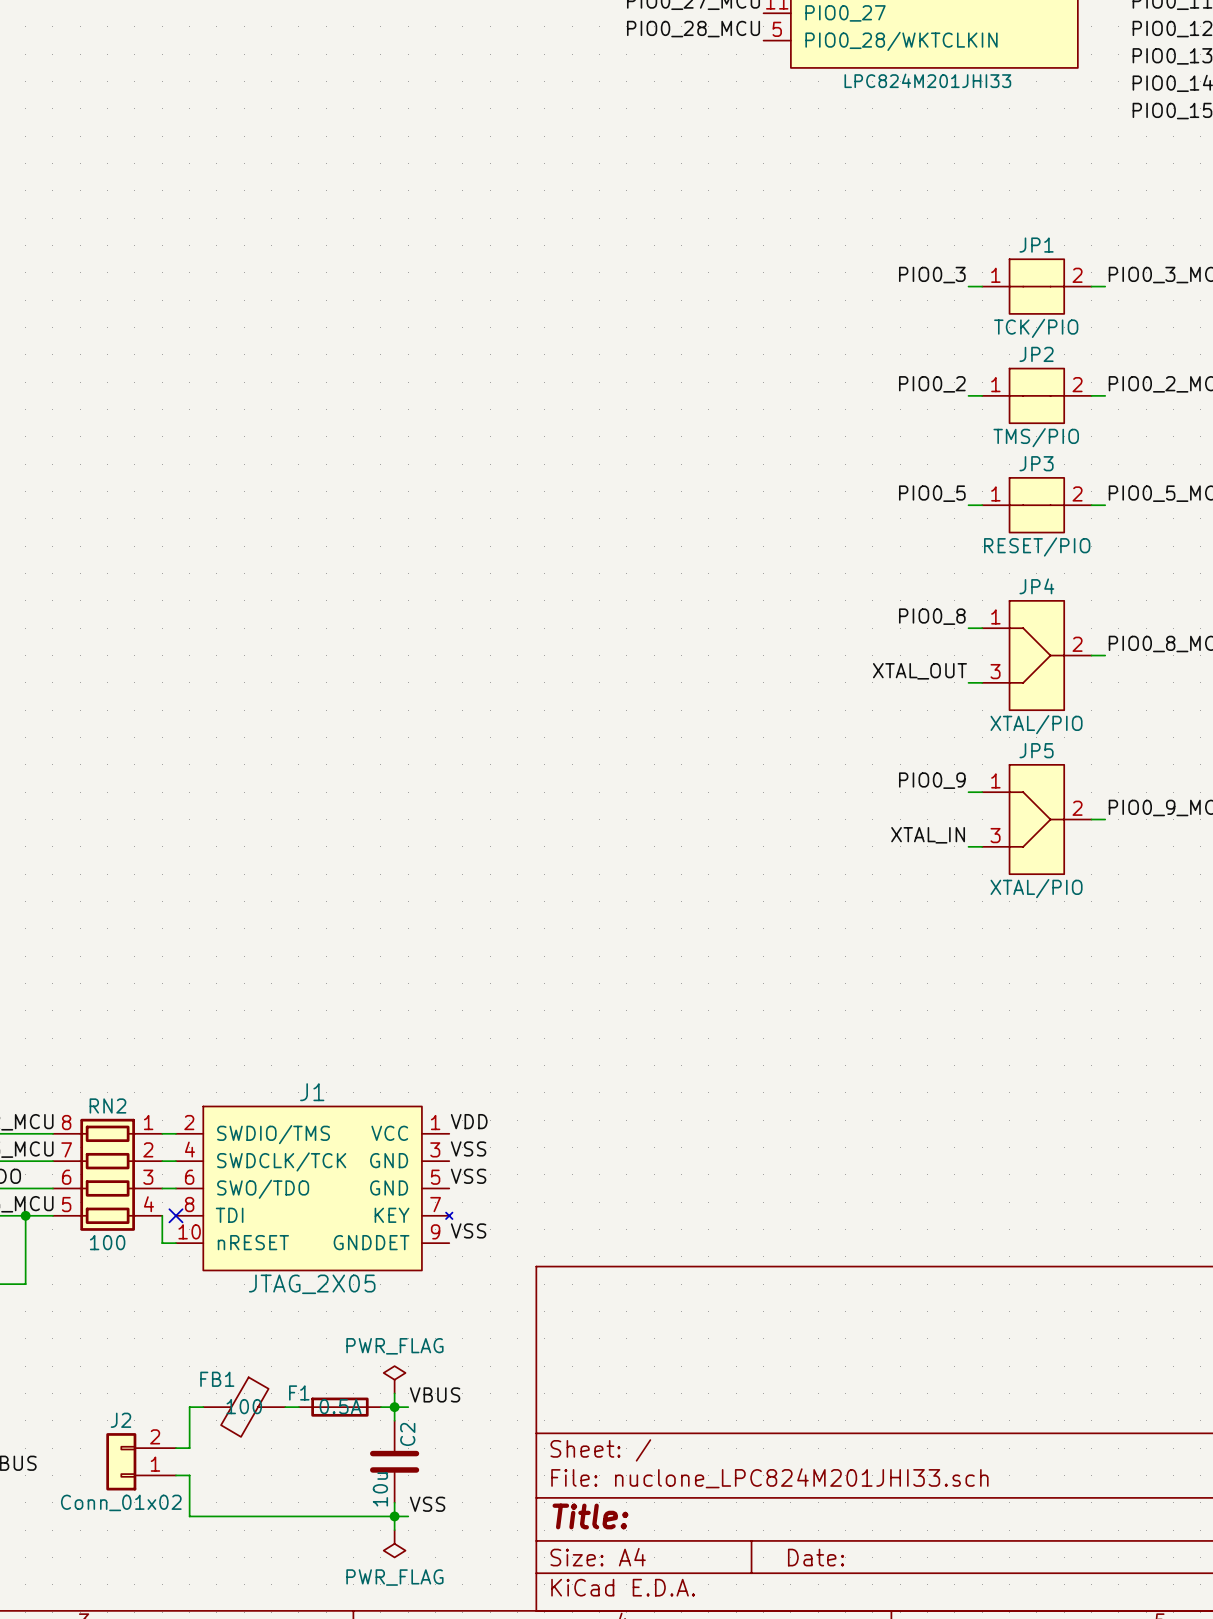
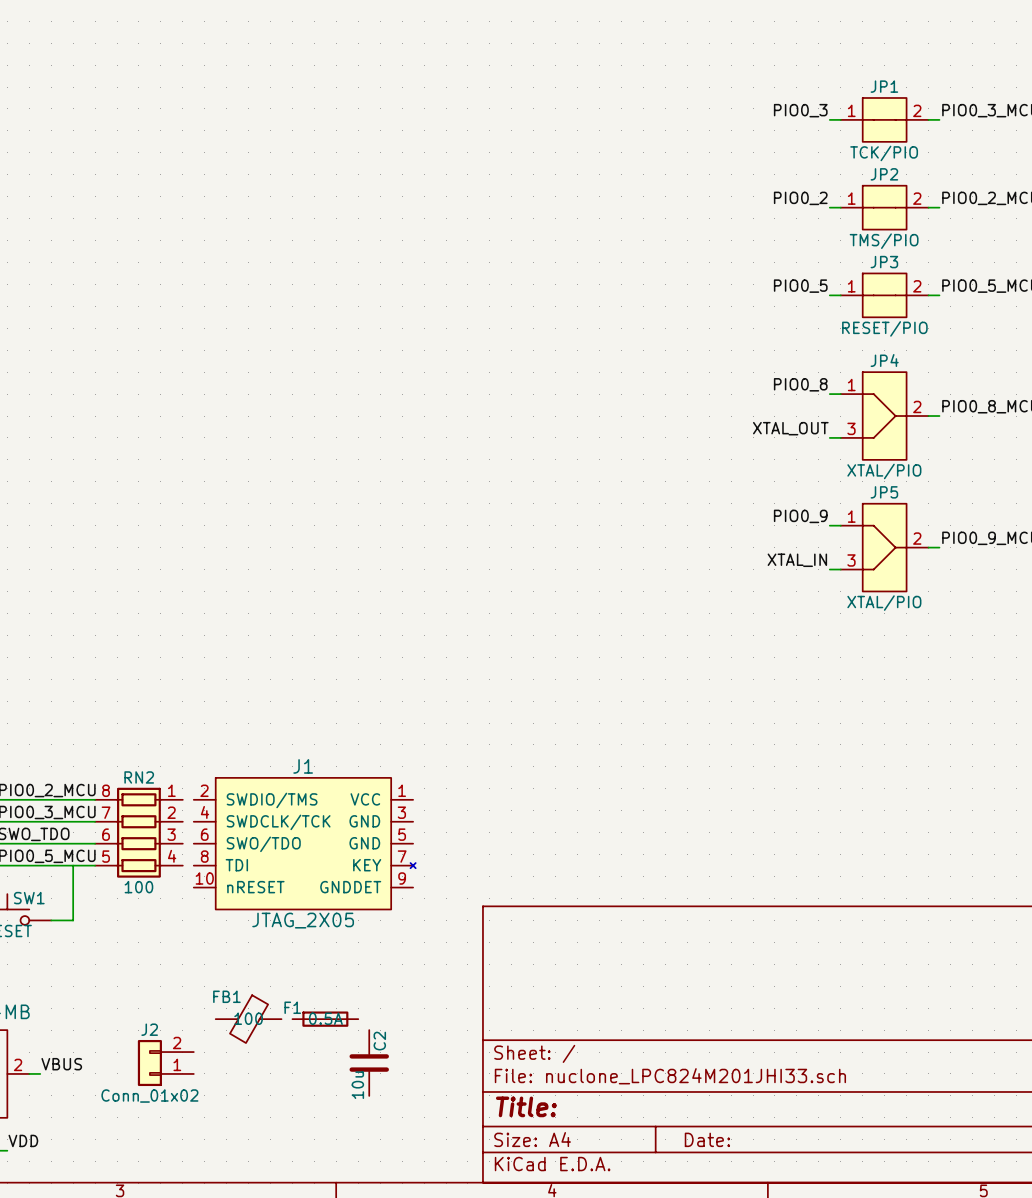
label: VDD (469, 1121) -> none
wire: (162, 1133) (175, 1133) -> none
label: VSS (468, 1148) -> none
wire: (162, 1161) (175, 1161) -> none
label: VSS (468, 1176) -> none
wire: (162, 1188) (175, 1188) -> none
junction: (25, 1215) -> none
wire: (162, 1215) (162, 1243) (175, 1243) -> none
no-connect mark: (175, 1215) -> none
label: VSS (468, 1230) -> none
power symbol: PWR_FLAG (394, 1379) -> none
wire: (394, 1393) (394, 1420) -> none
label: VBUS (435, 1394) -> none
wire: (203, 1407) (189, 1407) (189, 1448) (175, 1448) -> none
wire: (285, 1407) (298, 1407) -> none
wire: (380, 1407) (408, 1407) -> none
junction: (394, 1407) -> none
wire: (175, 1475) (189, 1475) (189, 1516) (408, 1516) -> none
wire: (394, 1502) (394, 1530) -> none
label: VSS (427, 1504) -> none
junction: (394, 1516) -> none
power symbol: PWR_FLAG (394, 1543) -> none

